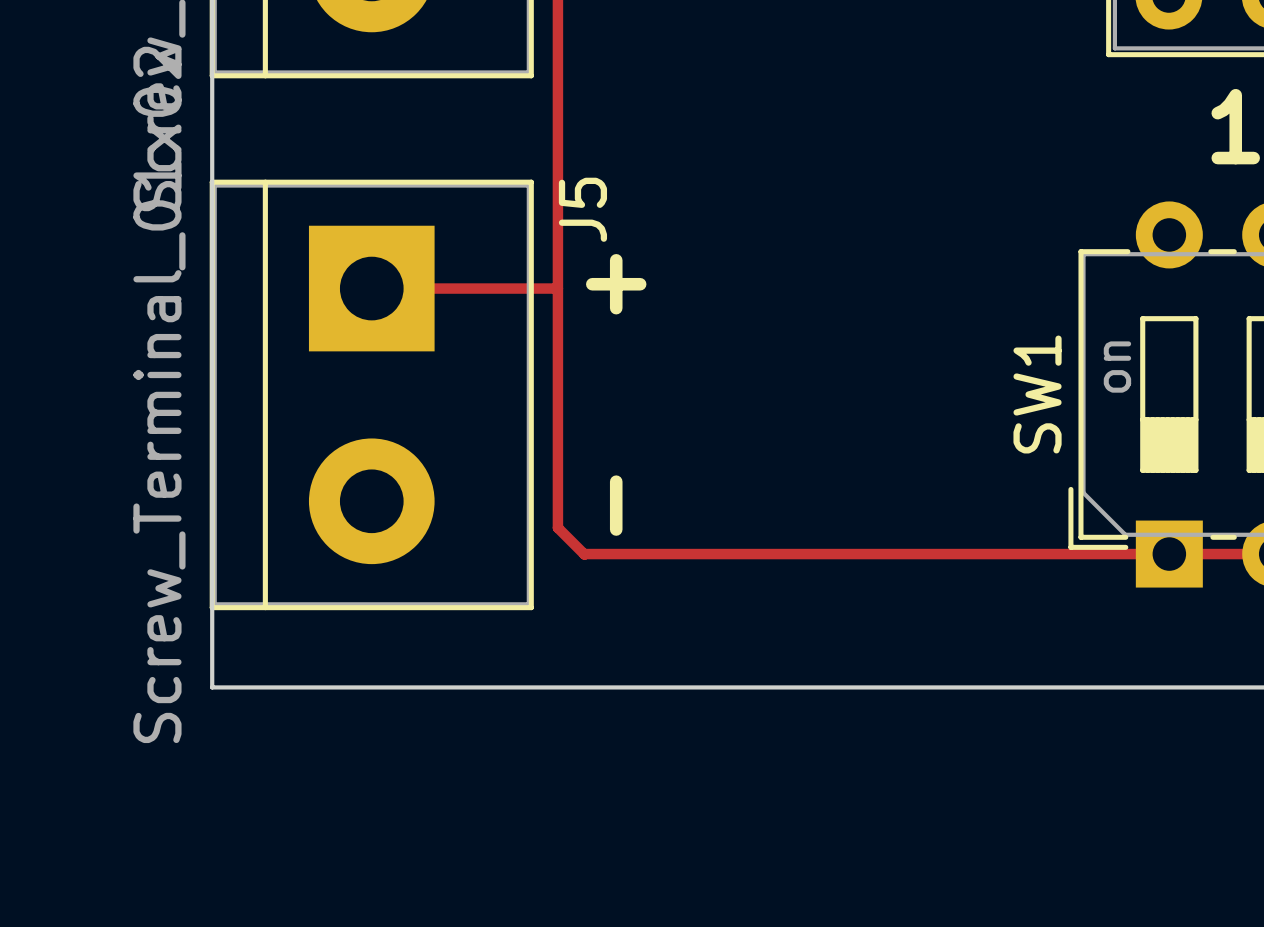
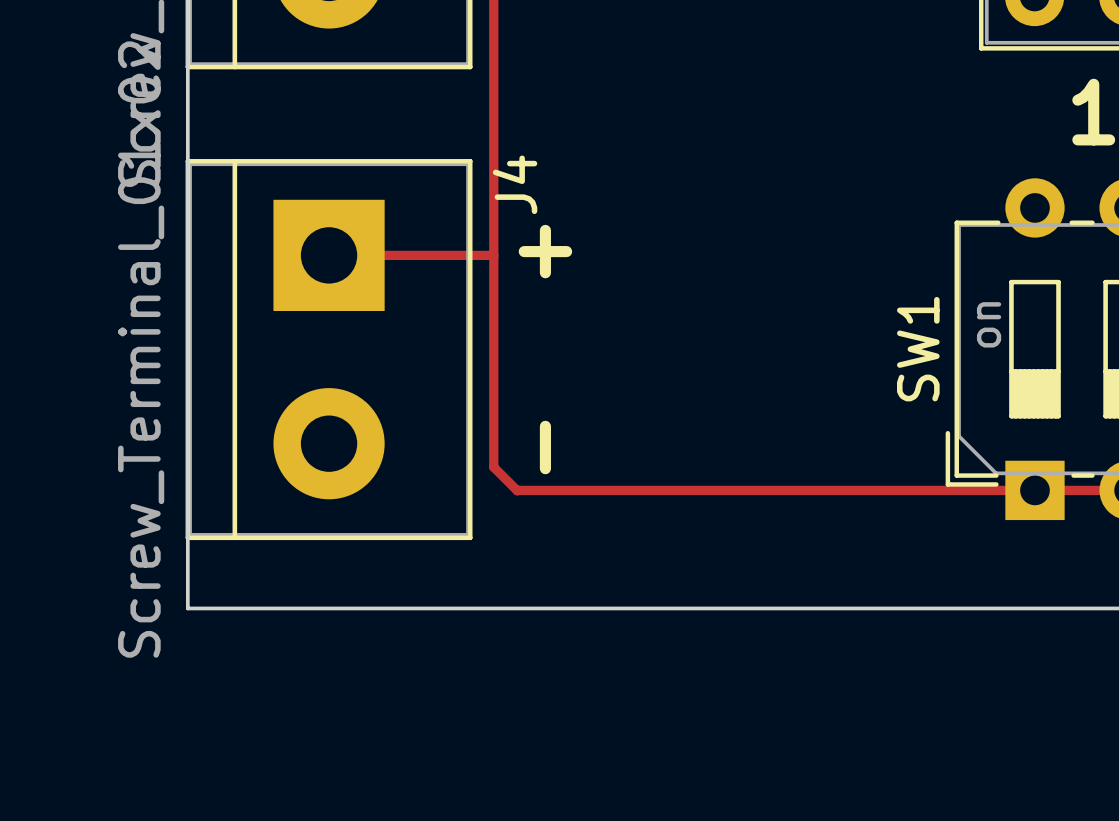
J5 name: J5 (582, 209) -> J4 (515, 184)

